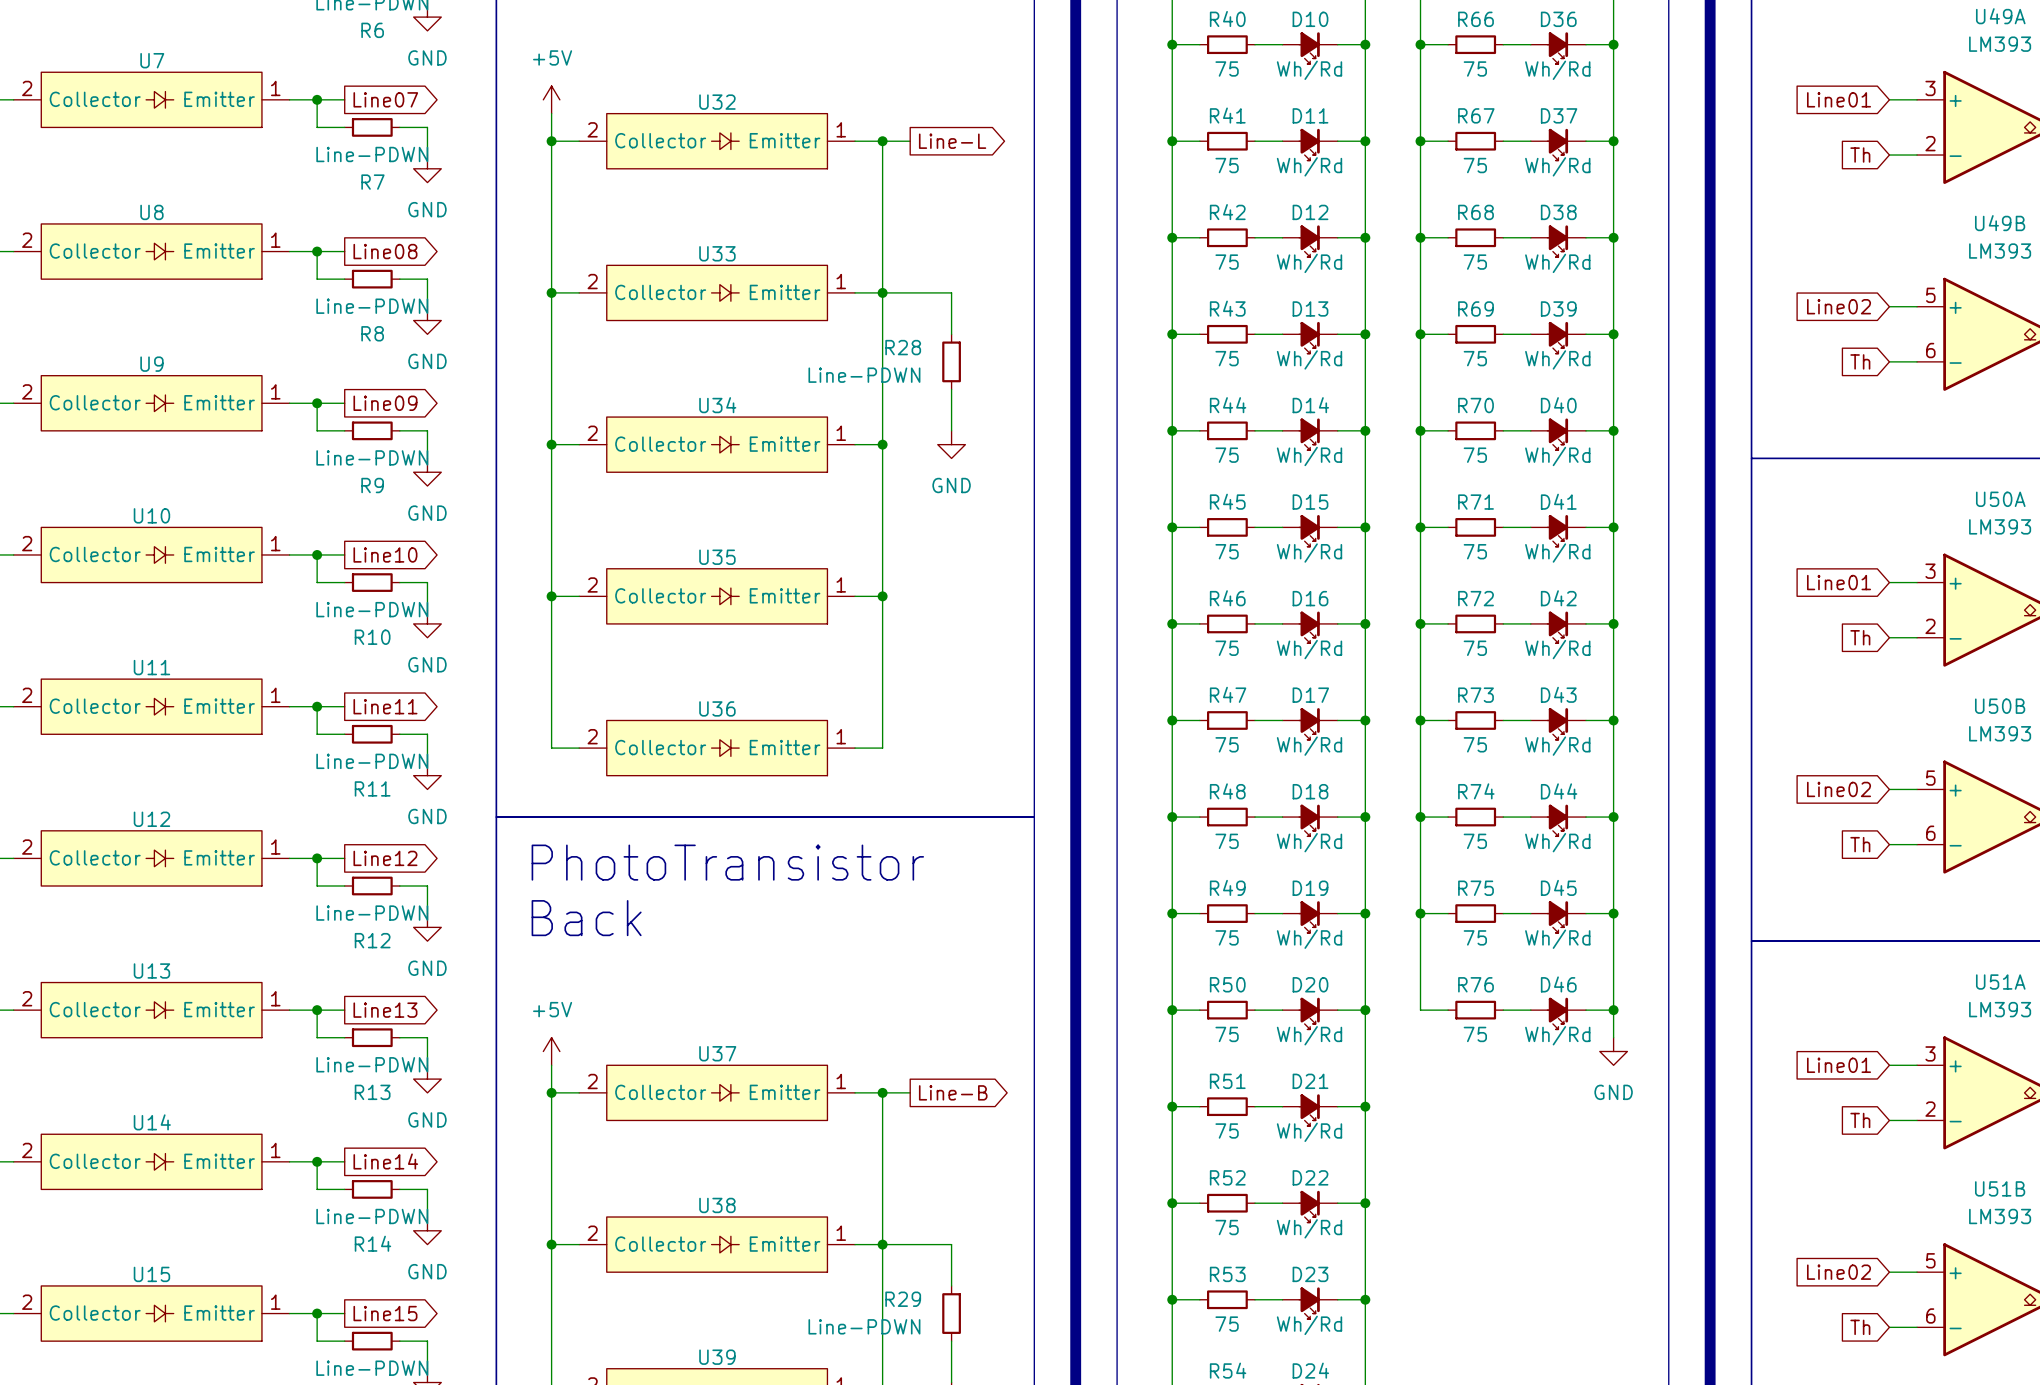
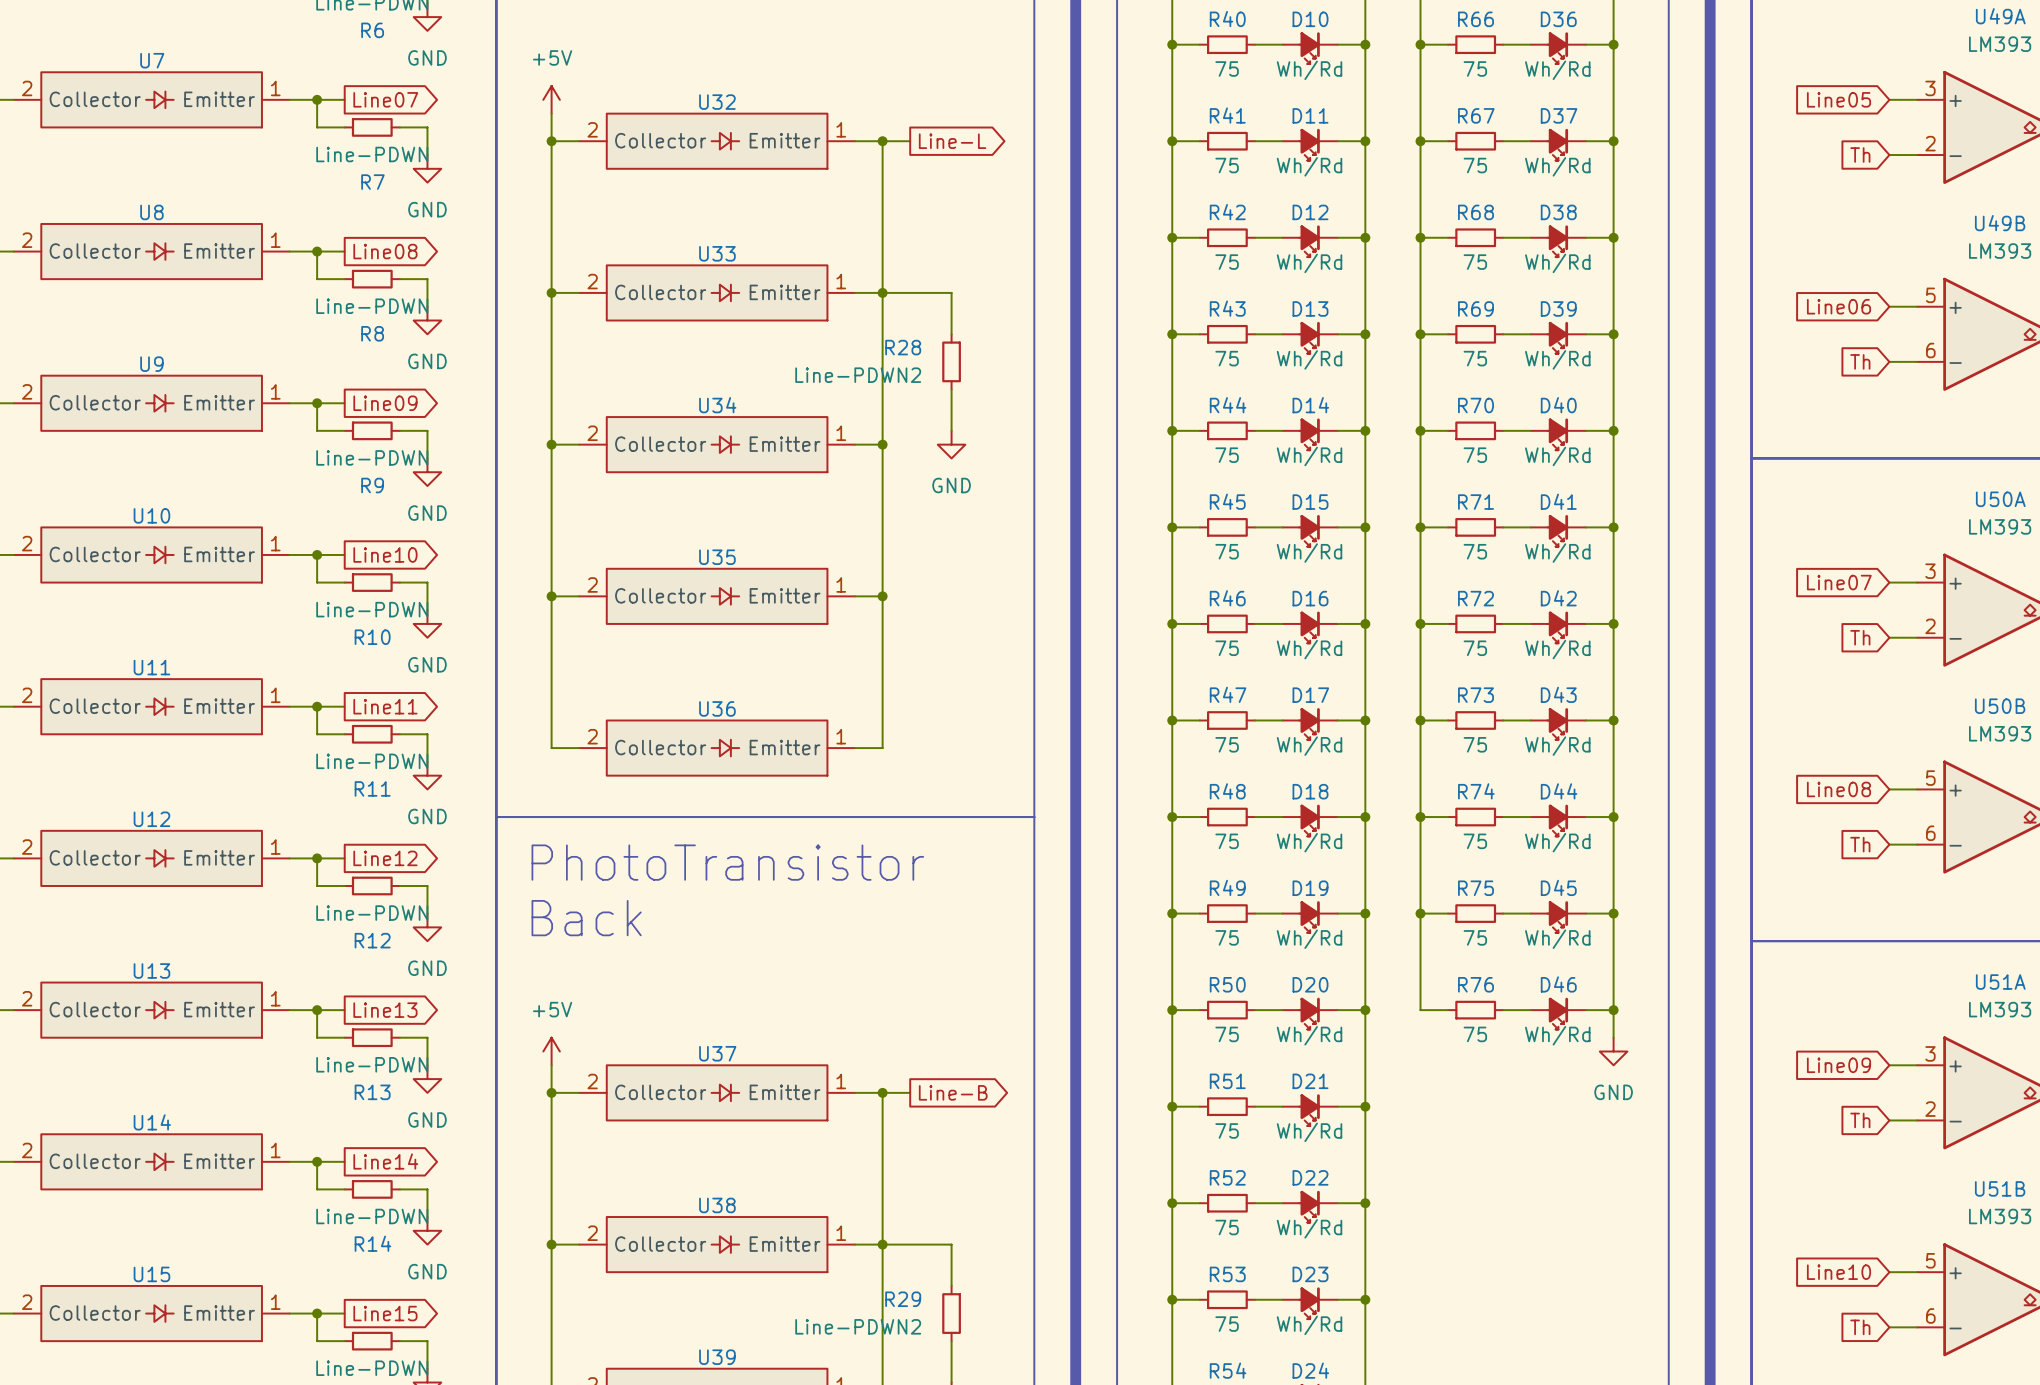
global label: Line01 (1839, 99) -> Line05 (1839, 99)
global label: Line02 (1839, 306) -> Line06 (1839, 306)
R28 value: Line-PDWN (864, 375) -> Line-PDWN2 (858, 375)
global label: Line01 (1839, 582) -> Line07 (1839, 582)
global label: Line02 (1839, 789) -> Line08 (1839, 789)
global label: Line01 (1839, 1065) -> Line09 (1839, 1065)
global label: Line02 (1839, 1272) -> Line10 (1839, 1272)
R29 value: Line-PDWN (864, 1326) -> Line-PDWN2 (858, 1326)

